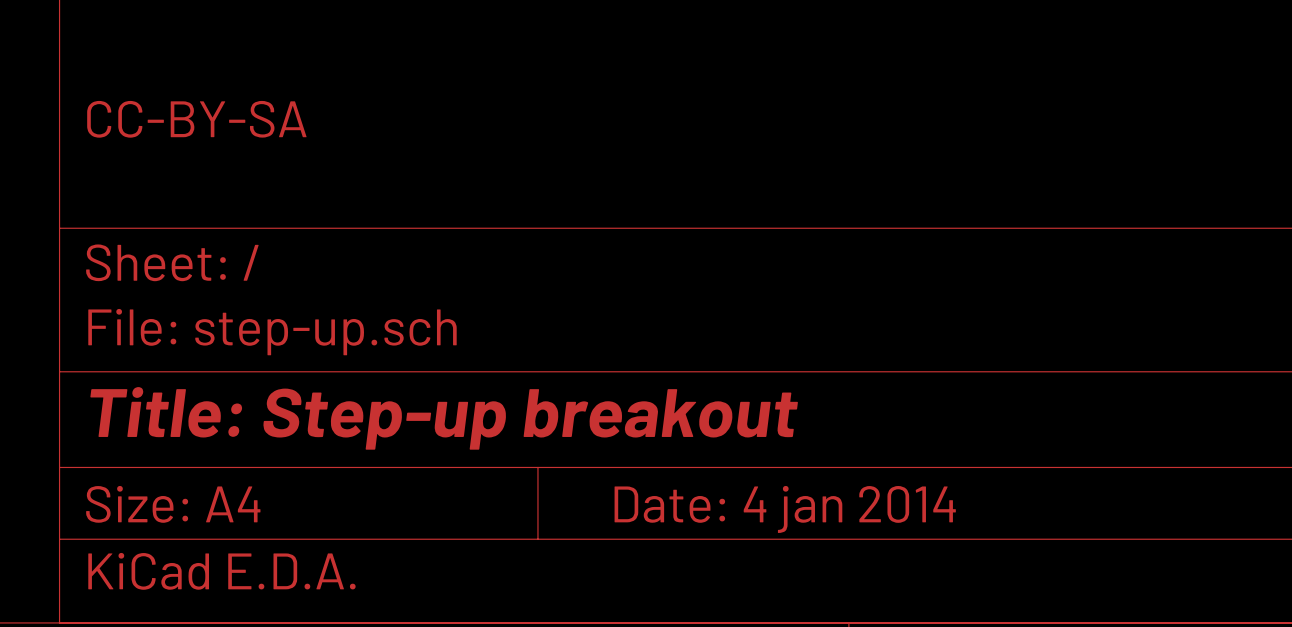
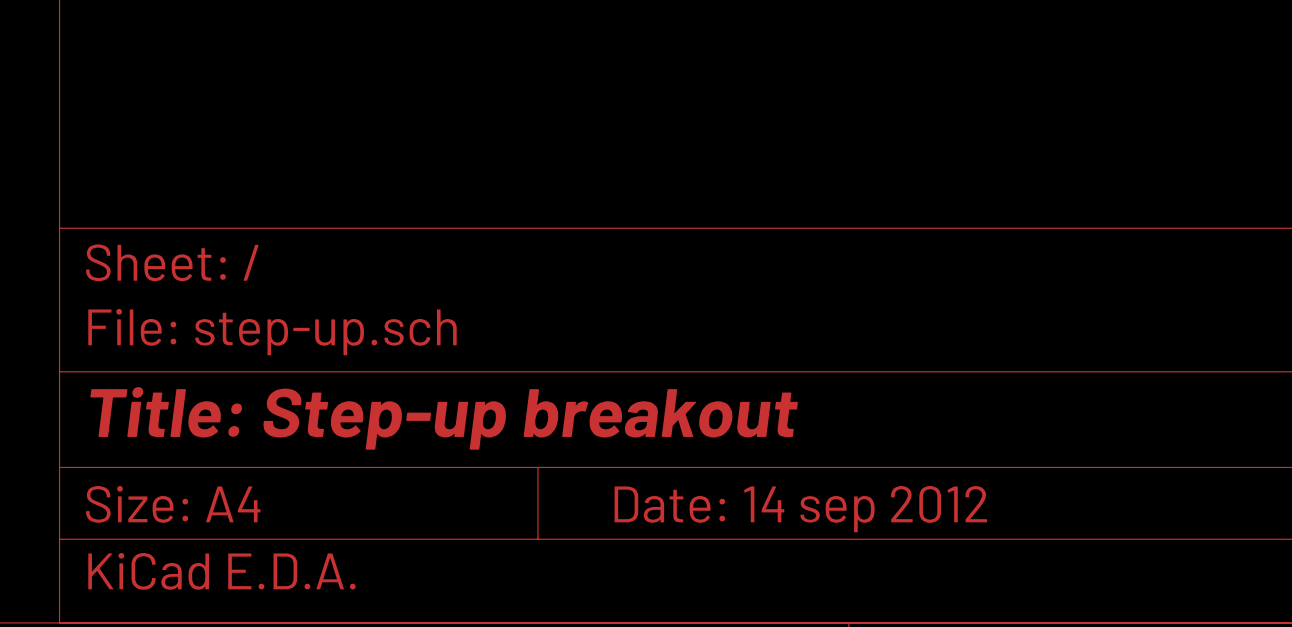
title block: CC-BY-SA (196, 119) -> none
title block: Date: 4 jan 2014 (785, 509) -> Date: 14 sep 2012 (800, 509)

